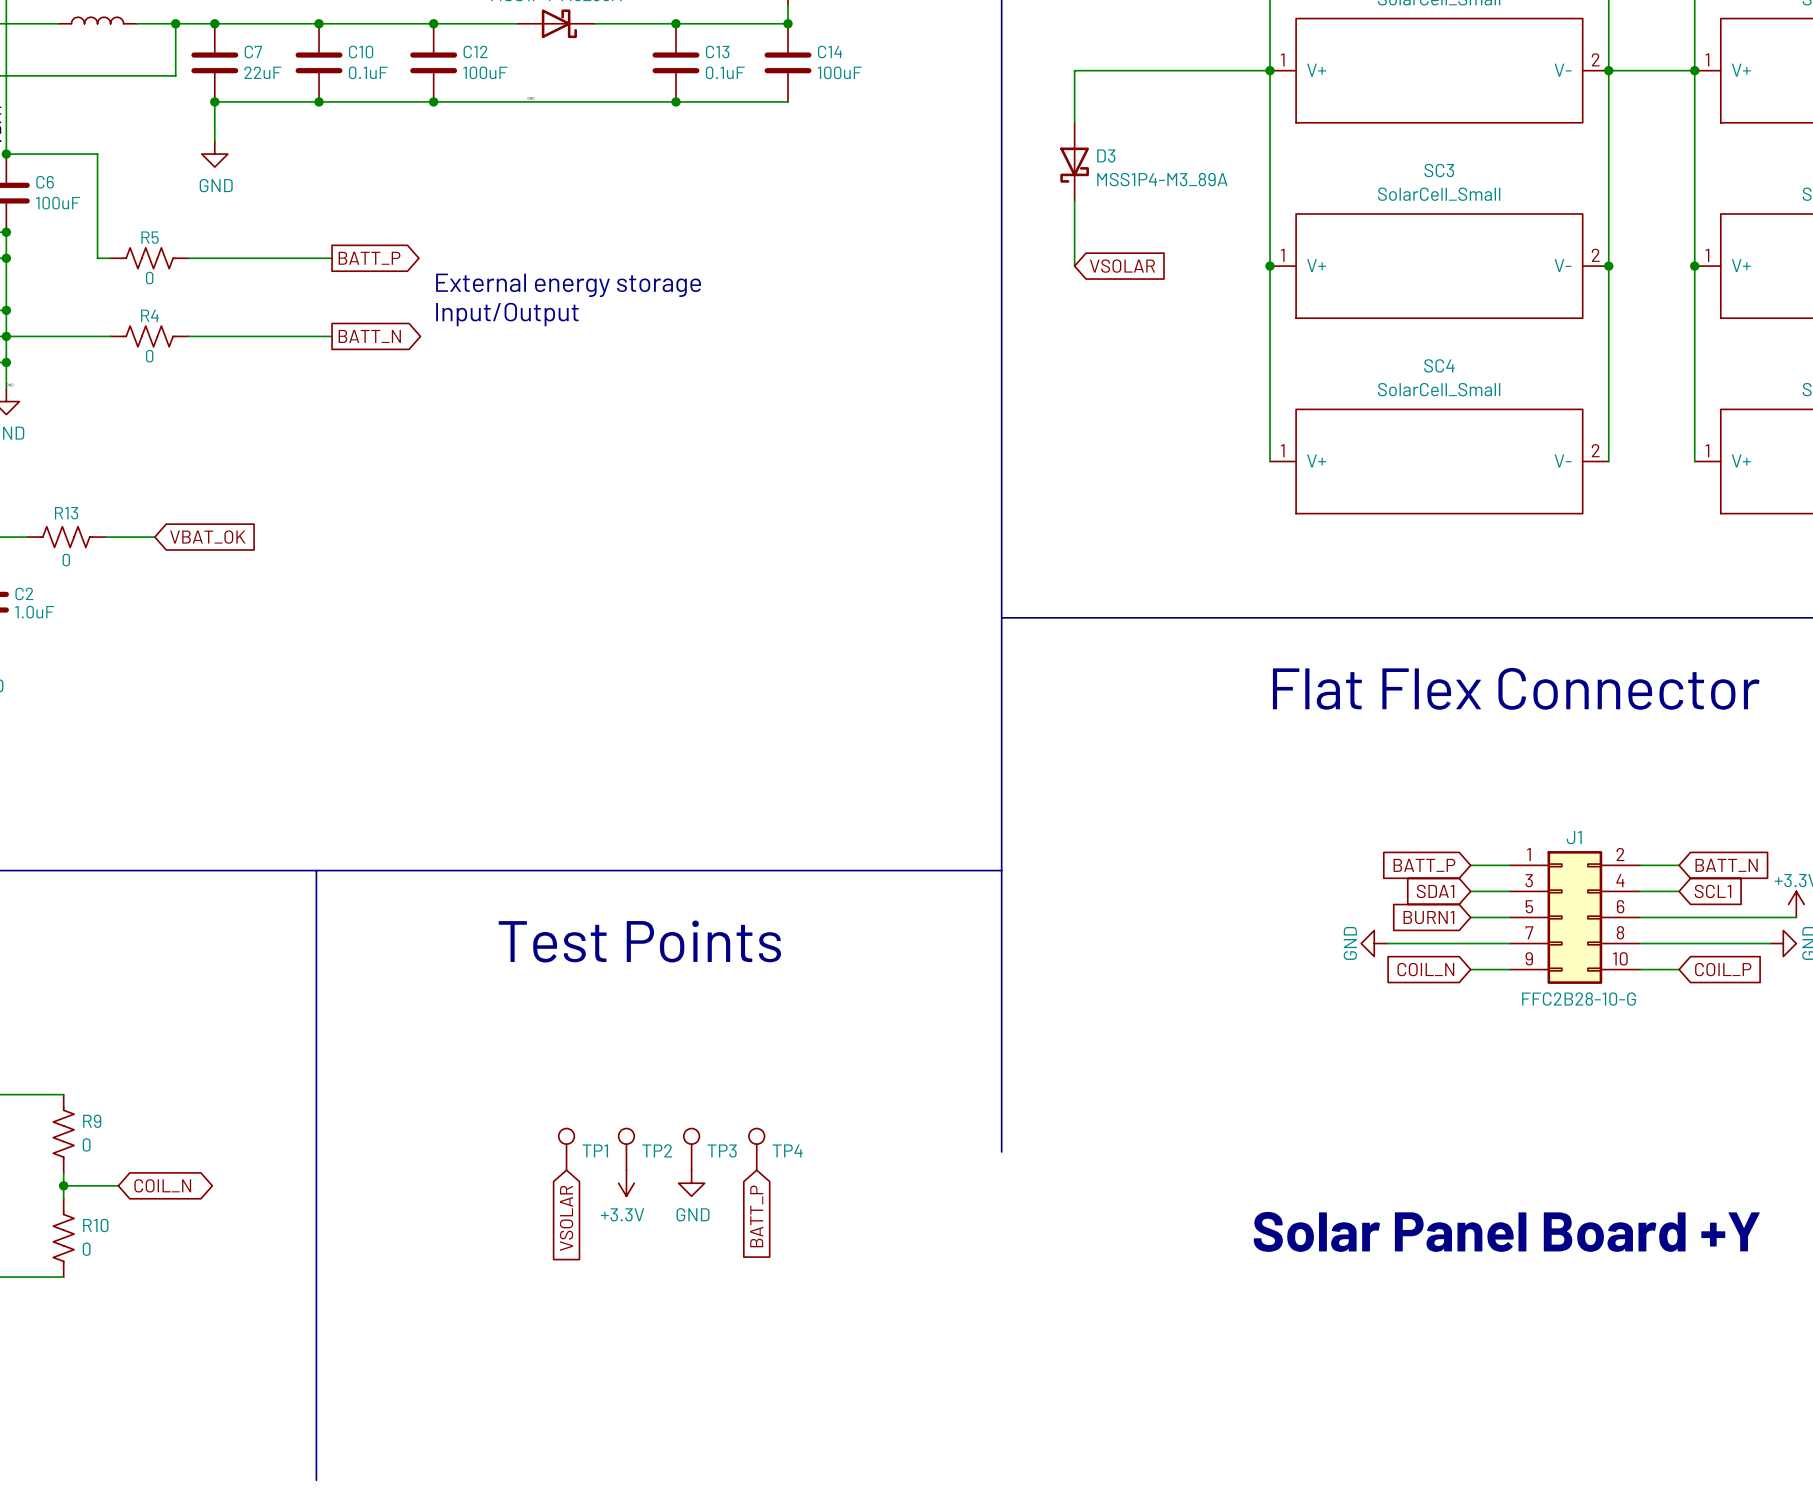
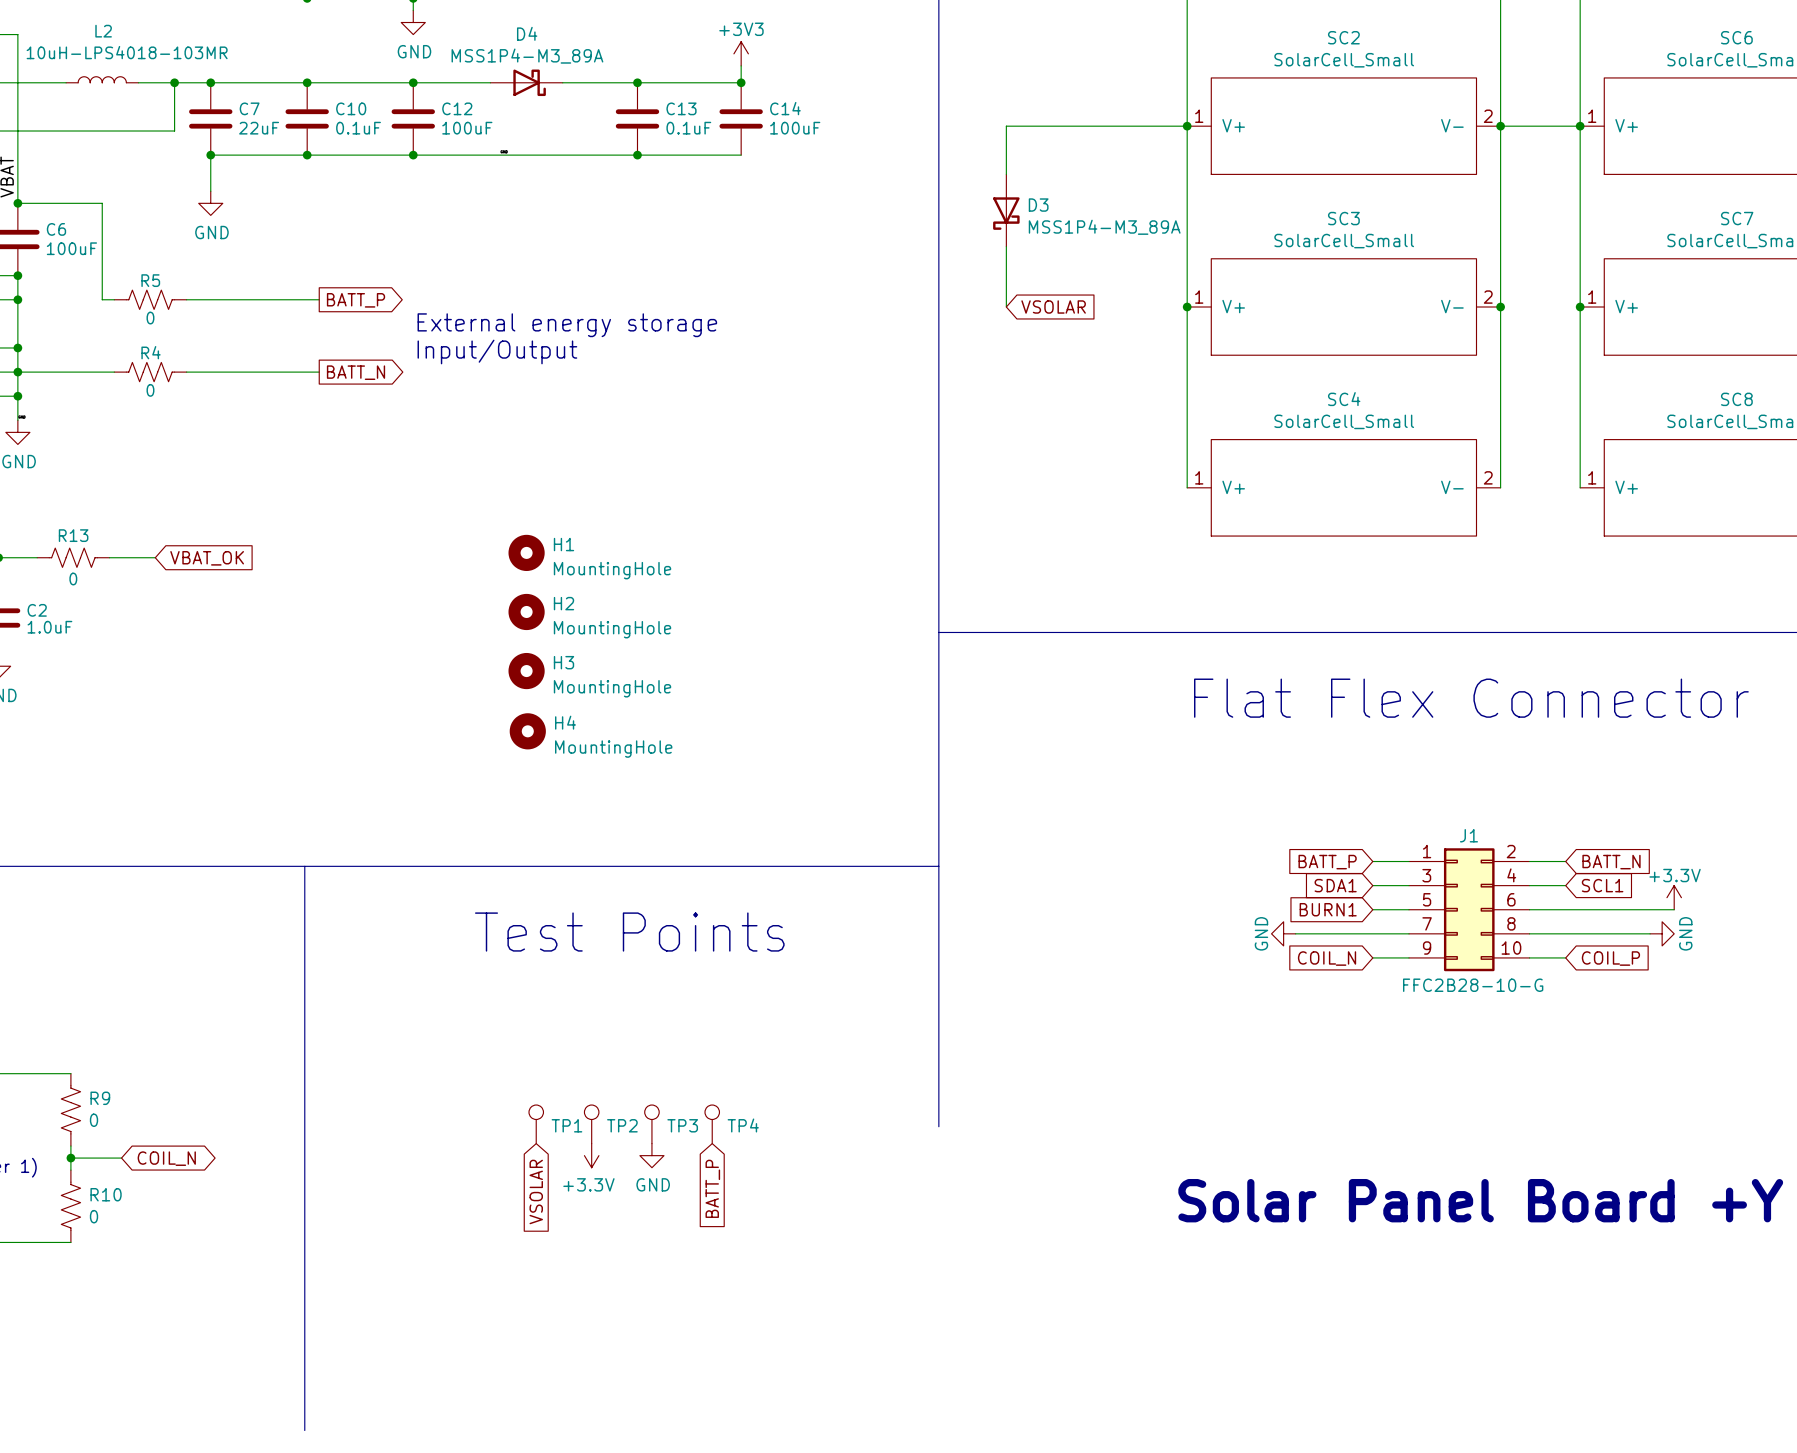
H1: none -> MountingHole (526, 552)
H2: none -> MountingHole (526, 611)
H3: none -> MountingHole (526, 671)
H4: none -> MountingHole (527, 731)

